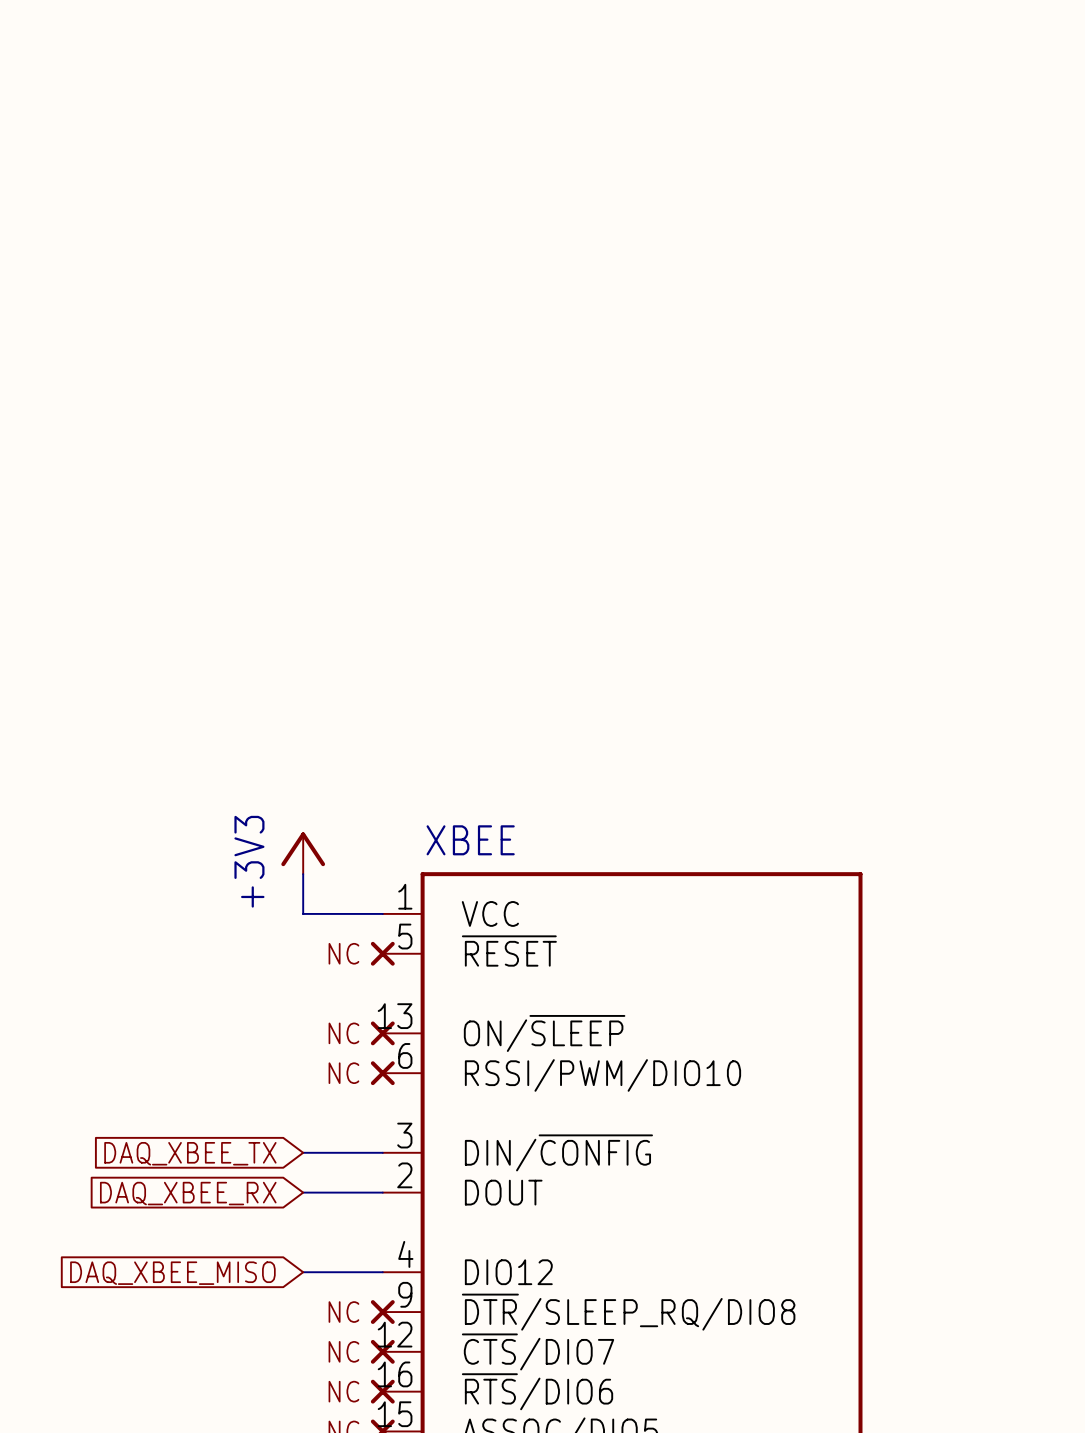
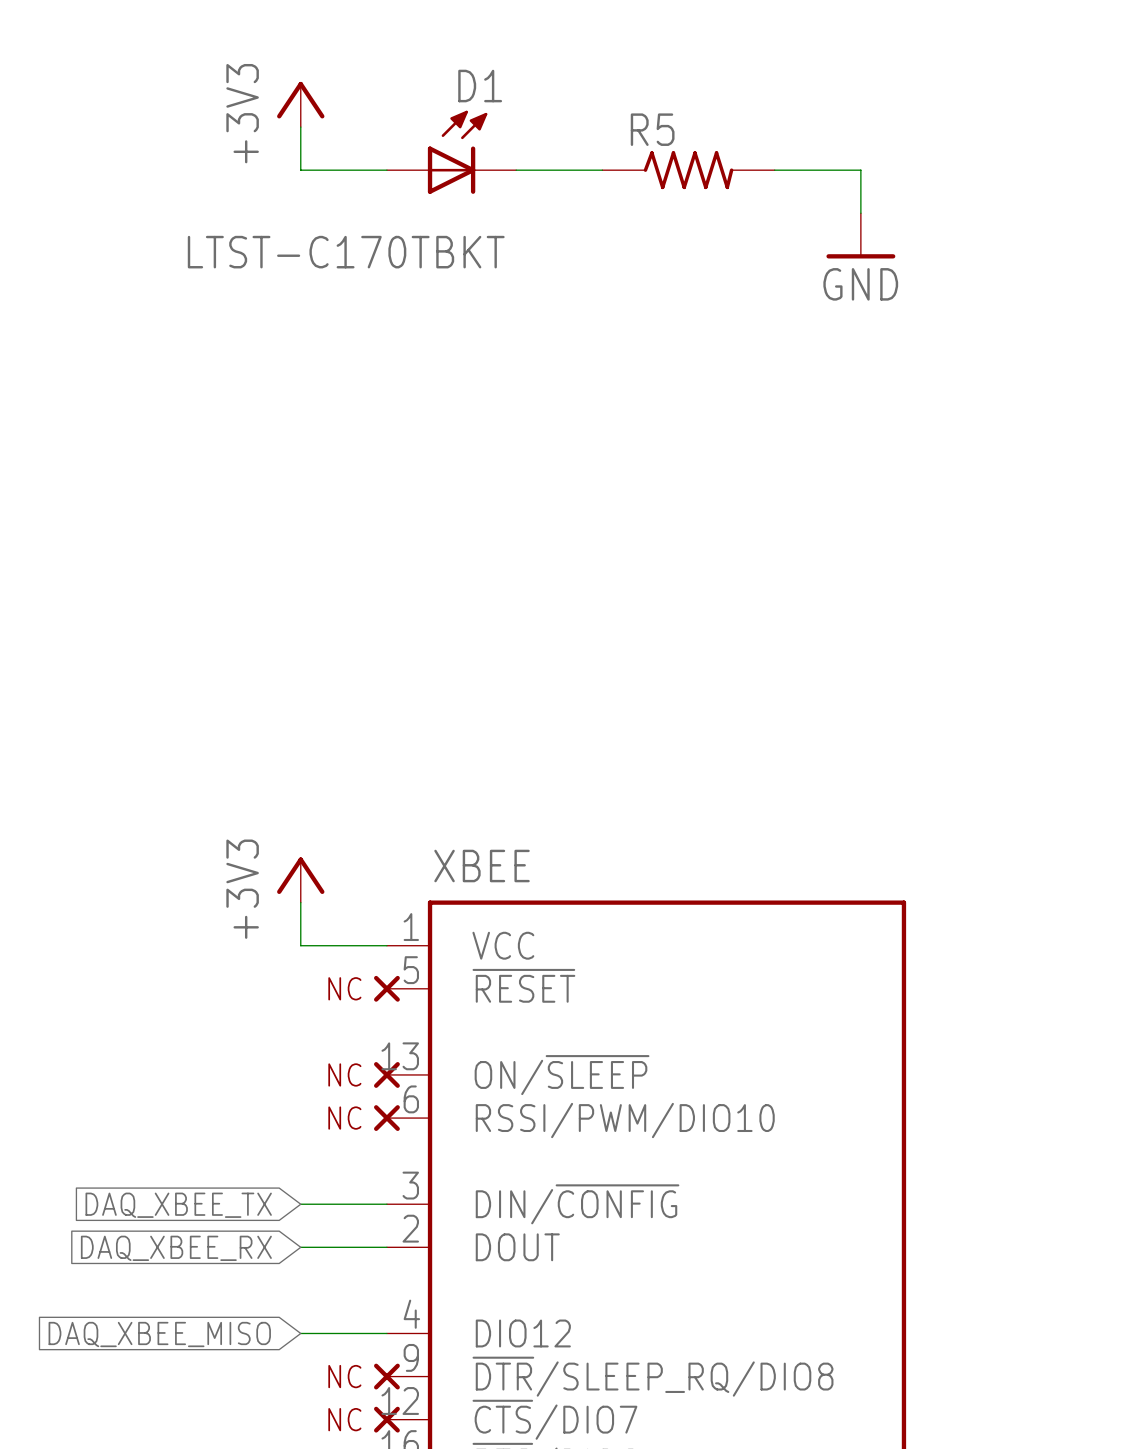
power symbol: none -> +3V3 (300, 104)
wire: none -> (300, 127) (300, 170) (386, 170)
D1: none -> LTST-C170TBKT (451, 152)
wire: none -> (516, 170) (602, 170)
R5: none -> (688, 170)
wire: none -> (774, 170) (860, 170) (860, 213)
power symbol: none -> GND (860, 235)

